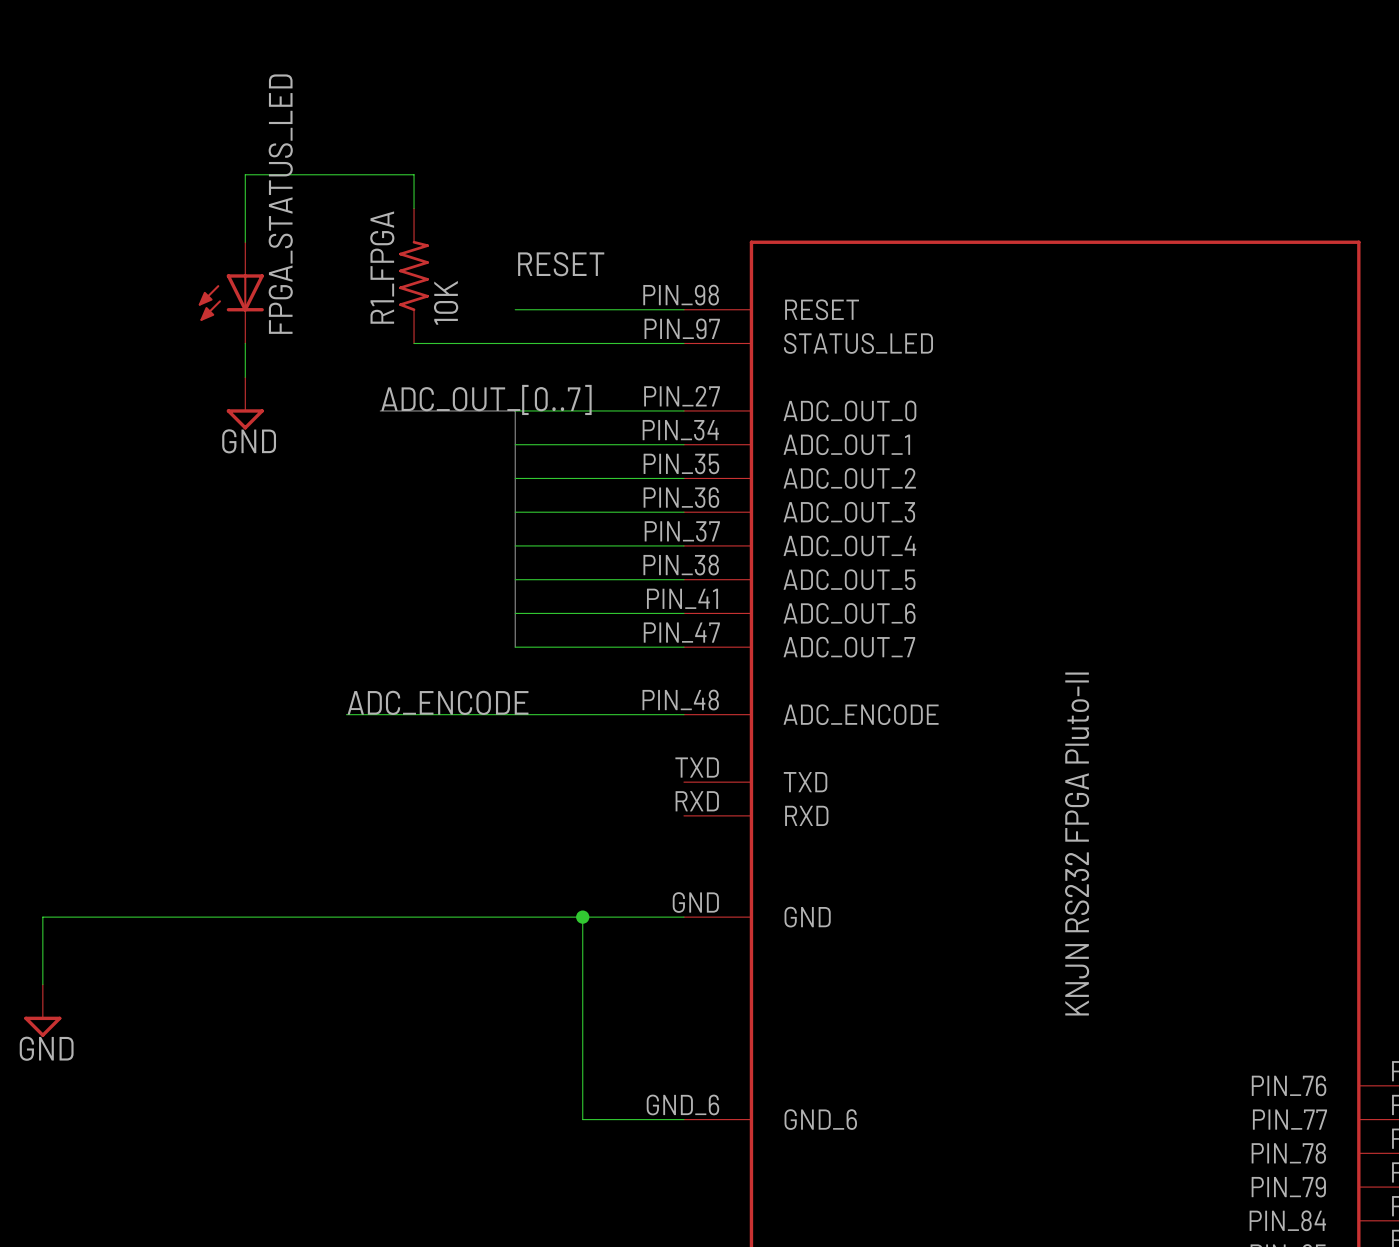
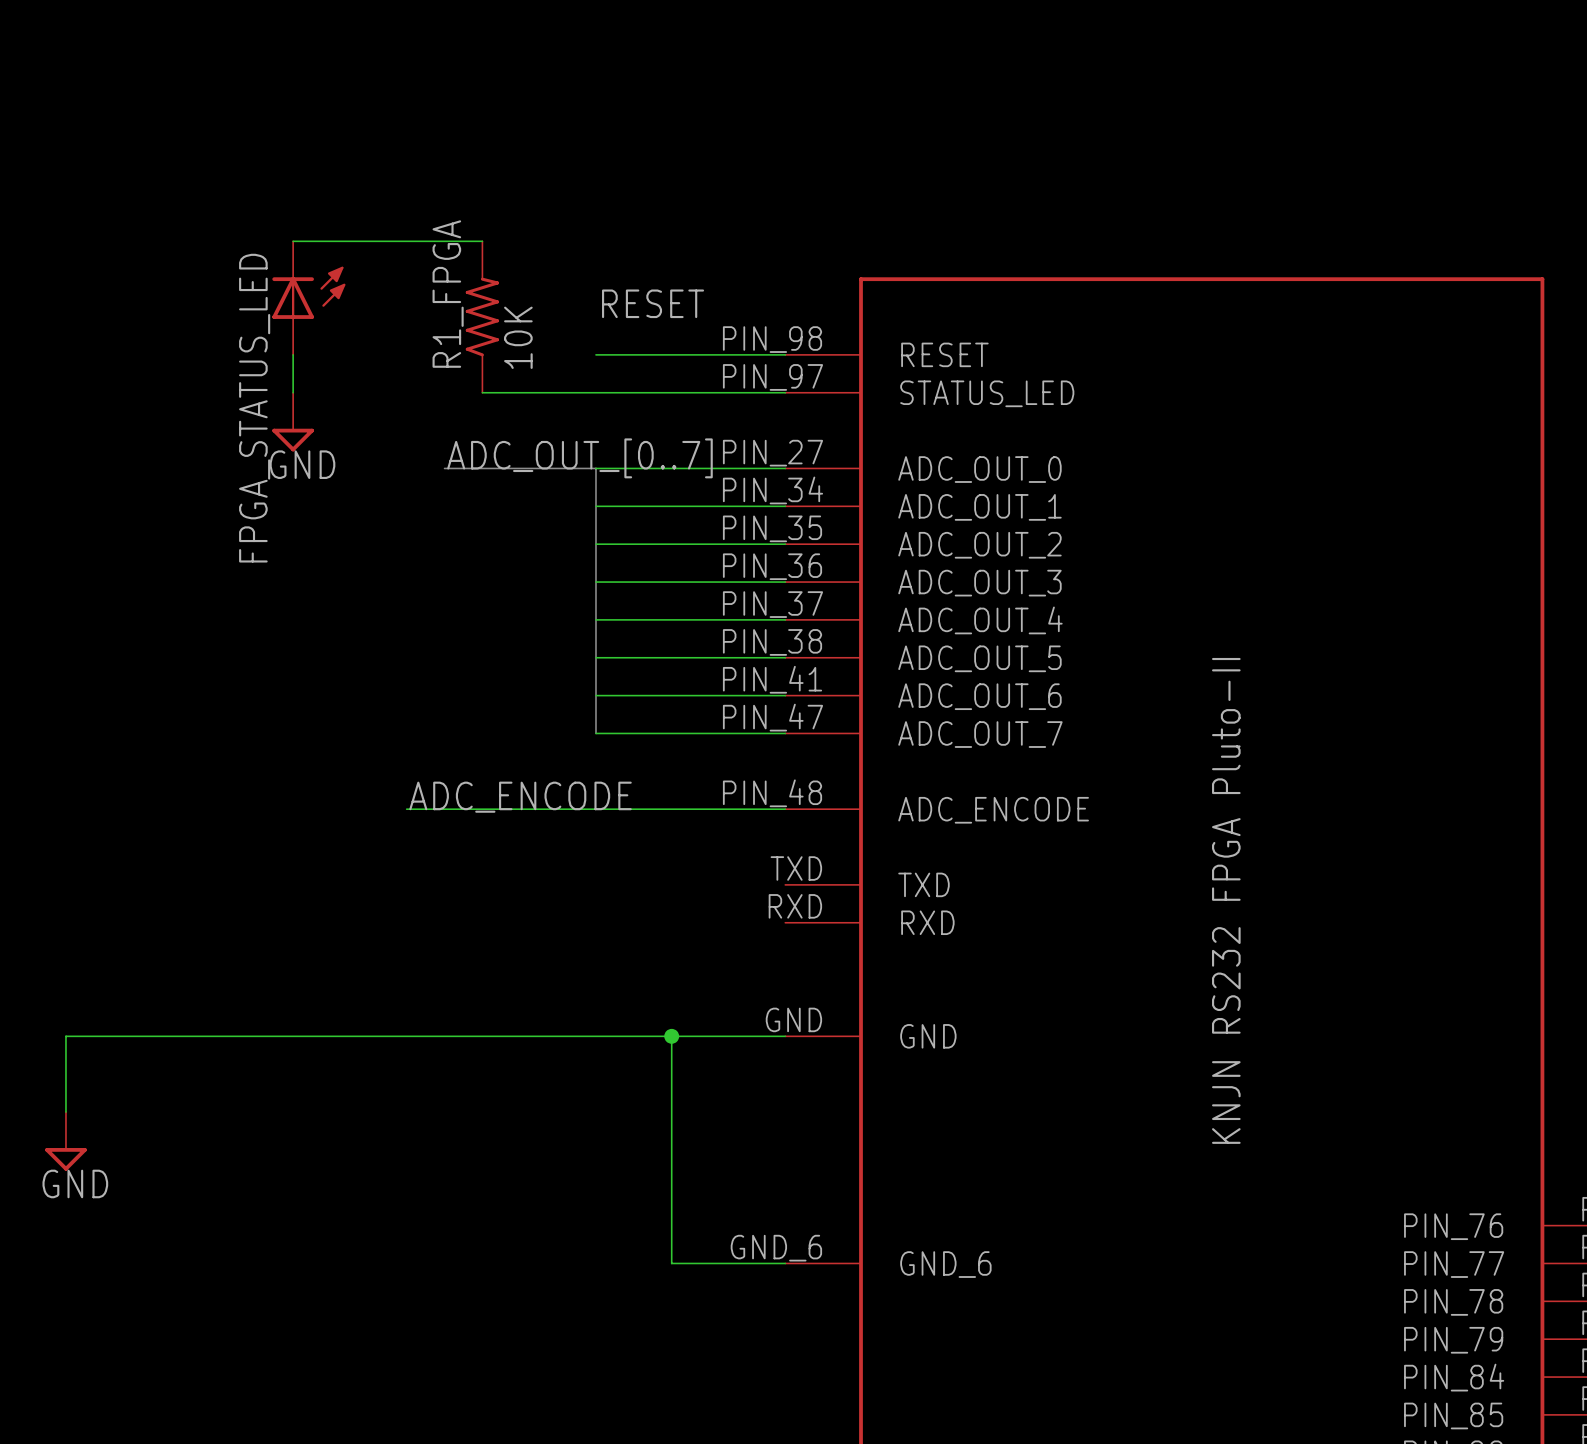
wire: (414, 208) (414, 174) (245, 174) (245, 242) -> (482, 241) (293, 241)
FPGA_STATUS_LED rotation: 0° (231, 297) -> 180° (308, 292)
power symbol position: GND (245, 403) -> GND (293, 422)

